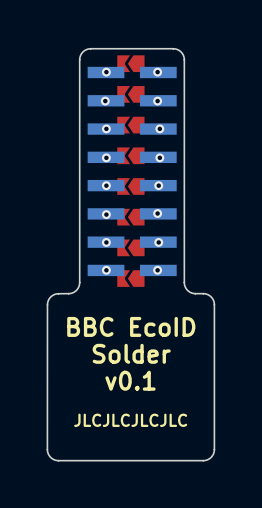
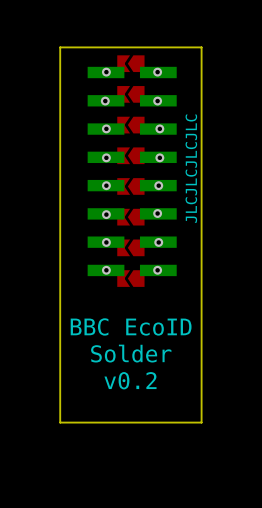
board edge: (173, 48) (89, 48) (83, 51) (79, 57) (79, 283) (73, 292) (52, 295) (47, 303) (47, 449) (49, 456) (56, 460) (203, 460) (210, 458) (214, 452) (214, 303) (208, 294) (189, 291) (184, 283) (184, 59) (181, 52) (173, 48) -> (201, 47) (201, 422) (60, 422) (60, 47) (201, 47)
text: v0.1 (130, 380) -> v0.2 (130, 380)
text rotation: 0° (130, 420) -> 90° counterclockwise (191, 168)
text position: JLCJLCJLCJLC (130, 420) -> JLCJLCJLCJLC (191, 168)

